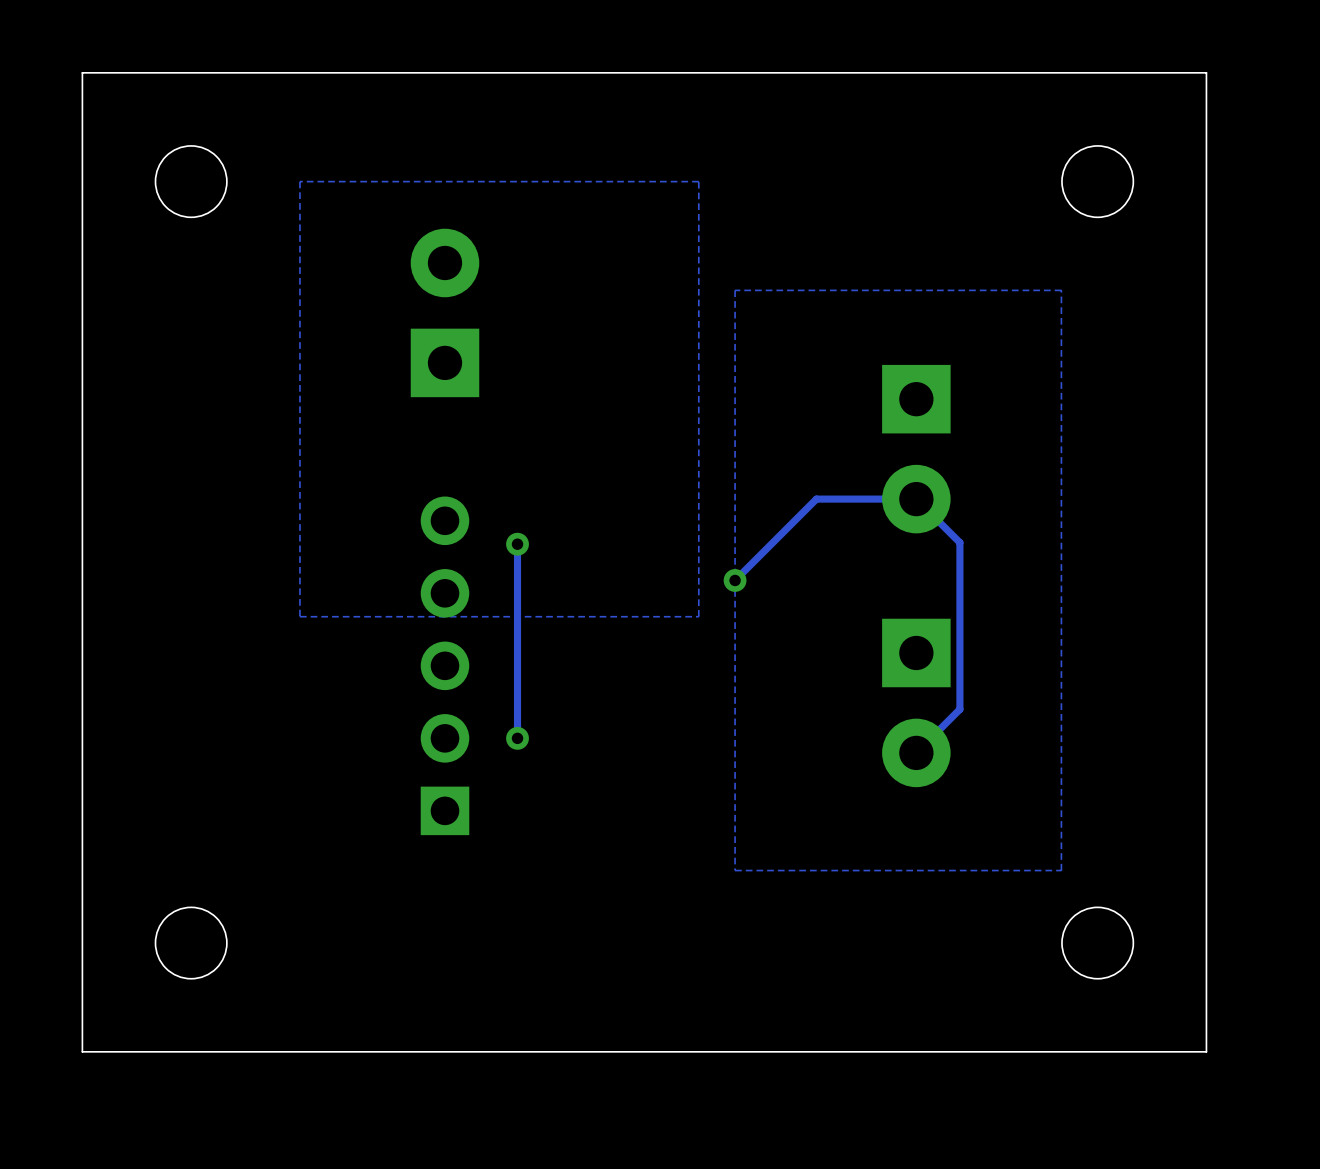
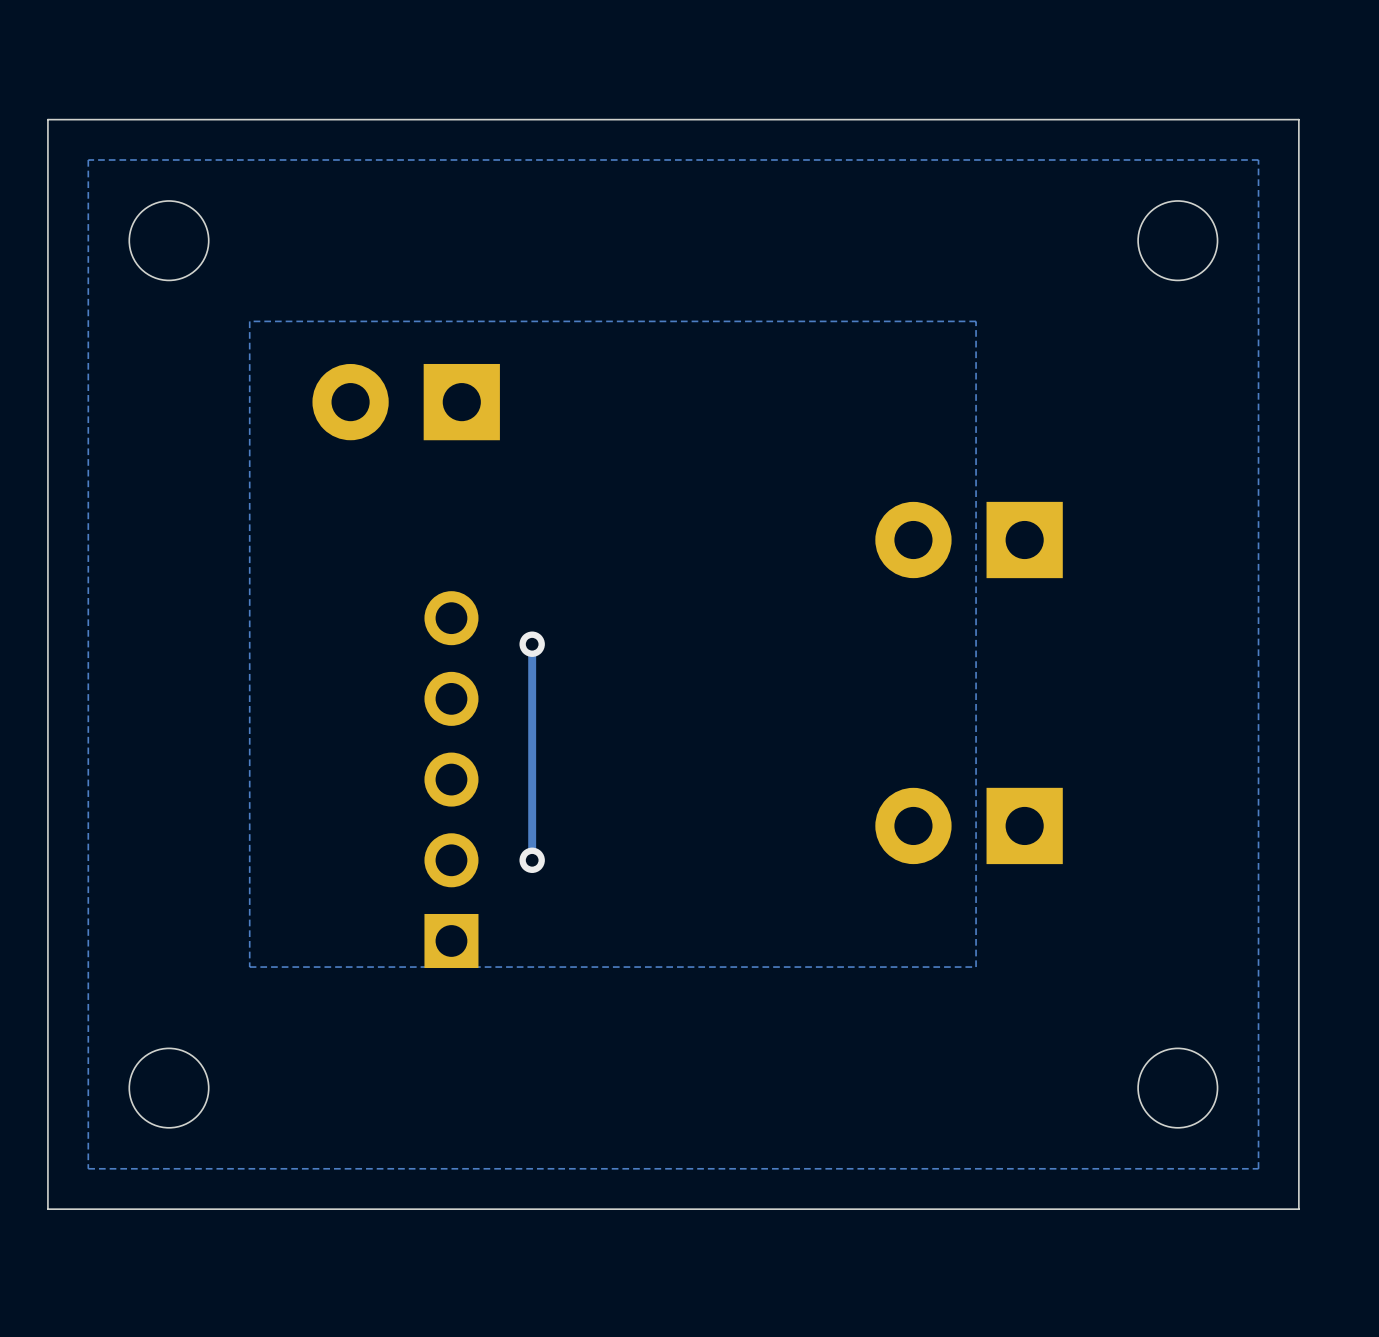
zone outline: none -> (1258, 159) (1258, 1168) (88, 1168) (88, 159) (1258, 159)
zone outline: (698, 181) (698, 616) (299, 616) (299, 181) (698, 181) -> none
zone outline: none -> (976, 321) (976, 967) (249, 967) (249, 321) (976, 321)
zone outline: (1061, 290) (1061, 870) (735, 870) (735, 290) (1061, 290) -> none
part rotation: 0° (444, 312) -> 90° counterclockwise (406, 402)
part rotation: 0° (916, 449) -> 90° clockwise (969, 540)
track: (735, 580) (816, 499) (916, 499) (959, 542) (959, 709) (916, 752) -> none
via: (735, 580) -> none
part rotation: 0° (916, 702) -> 90° clockwise (969, 825)

